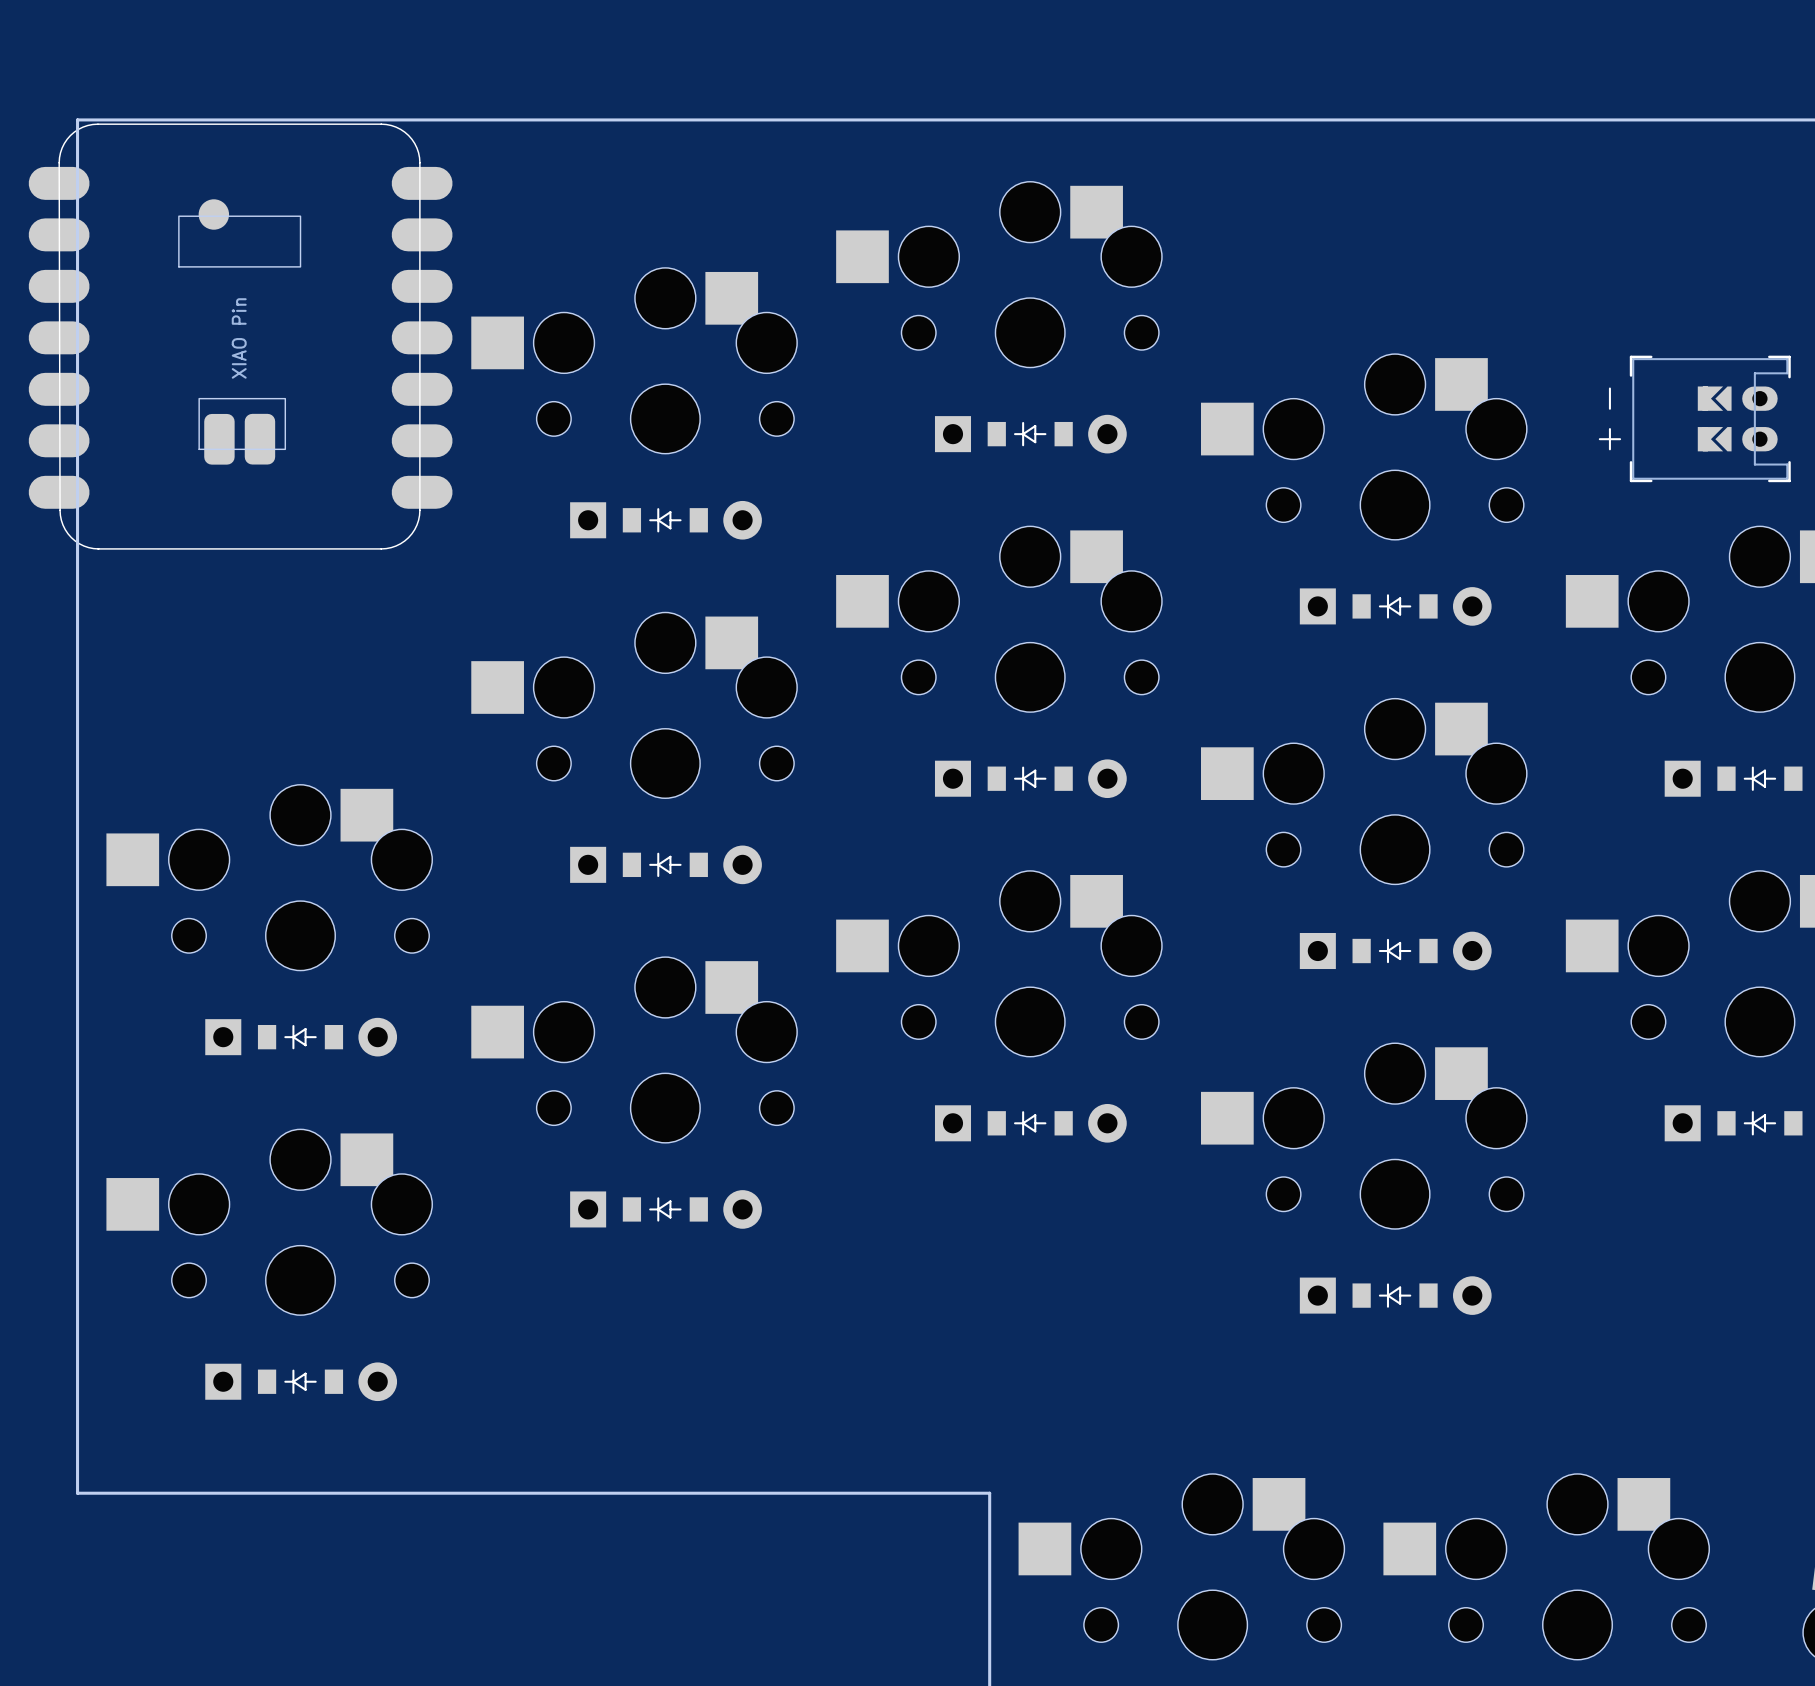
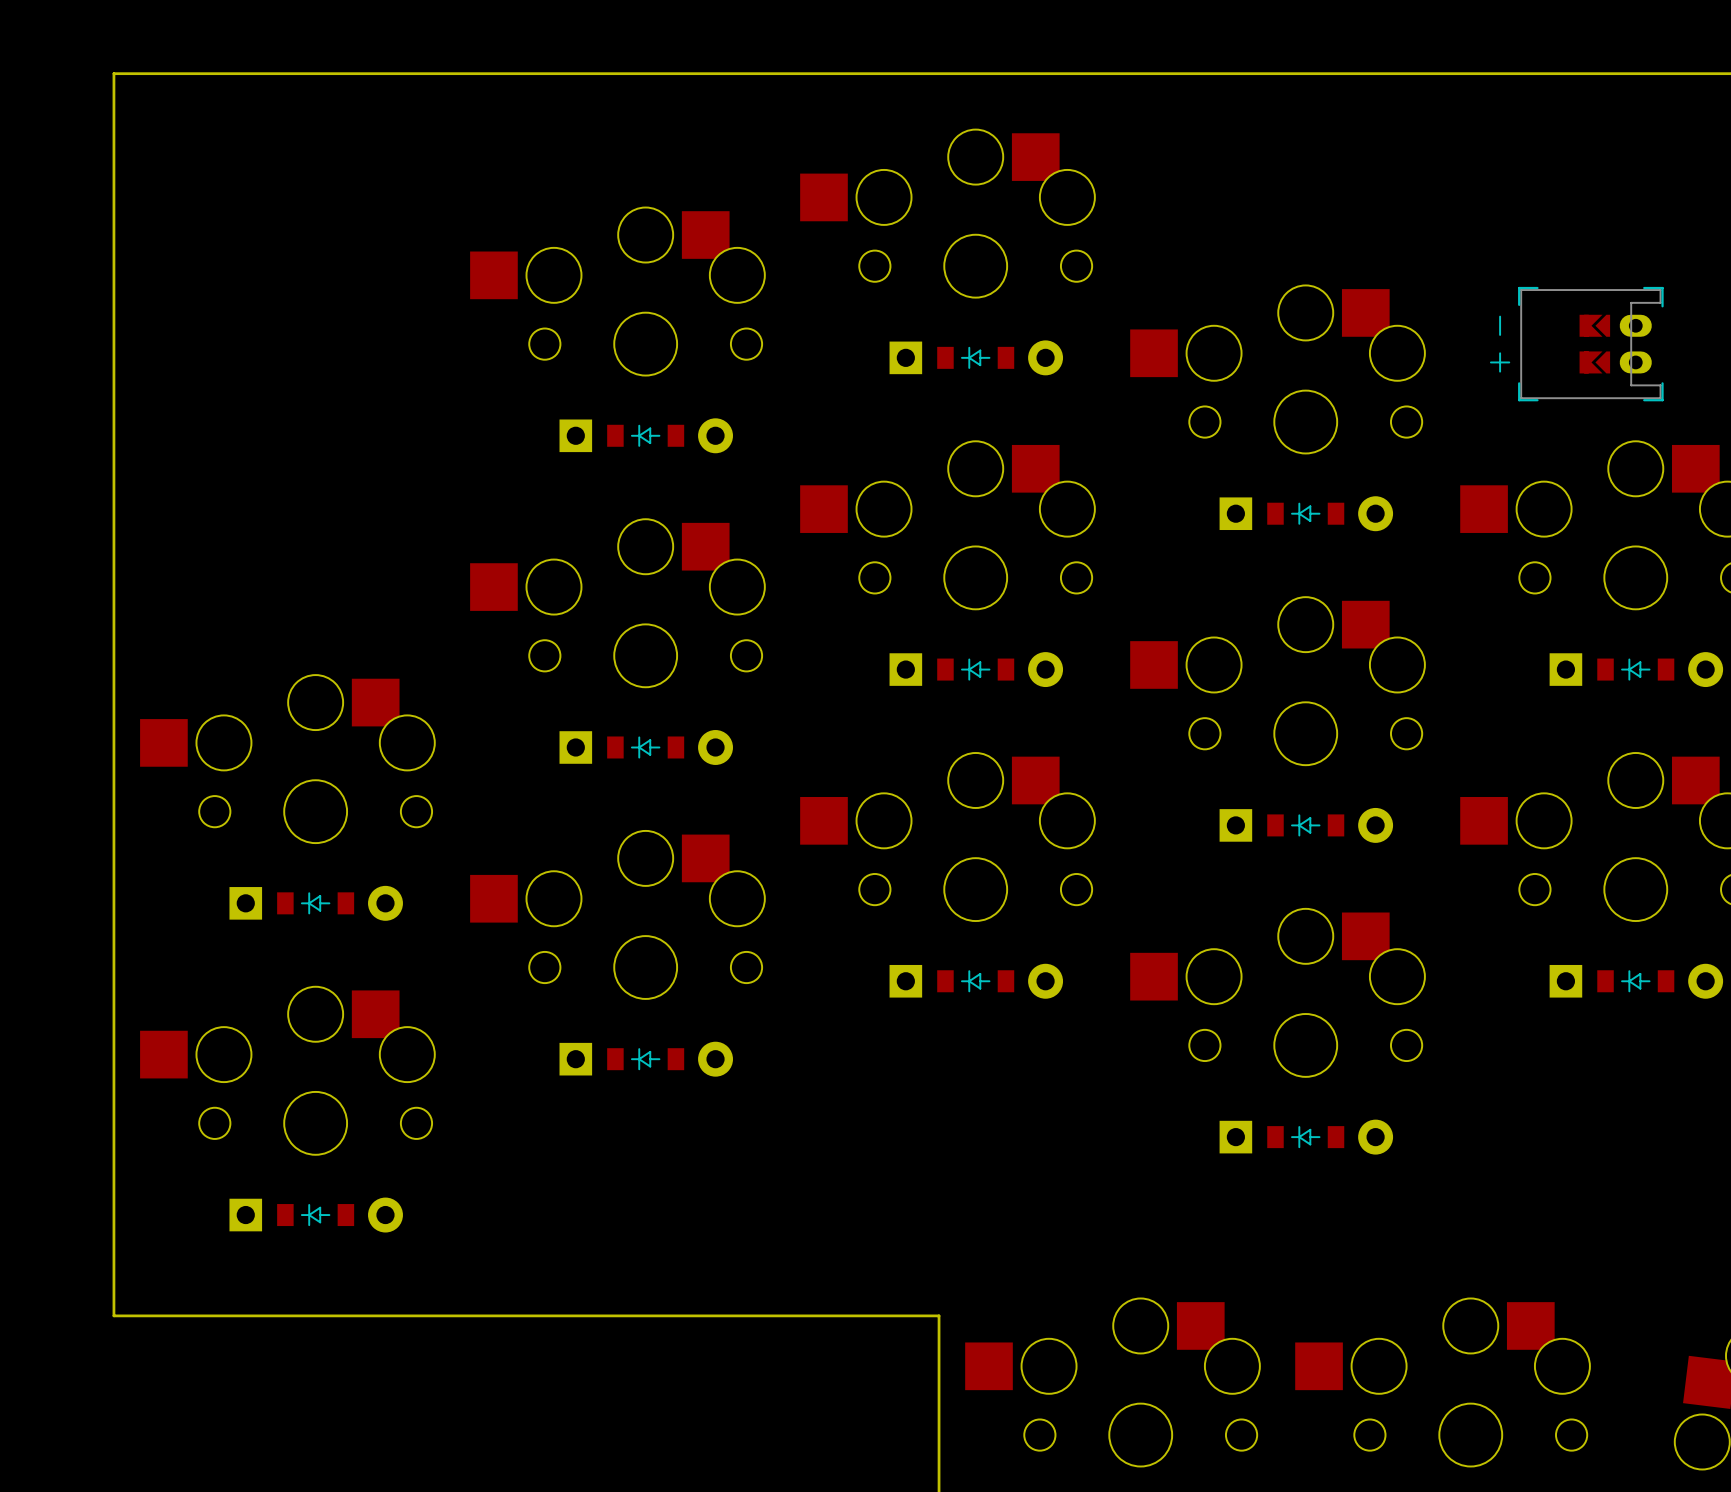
part: XIAO Pin (240, 336) -> none

